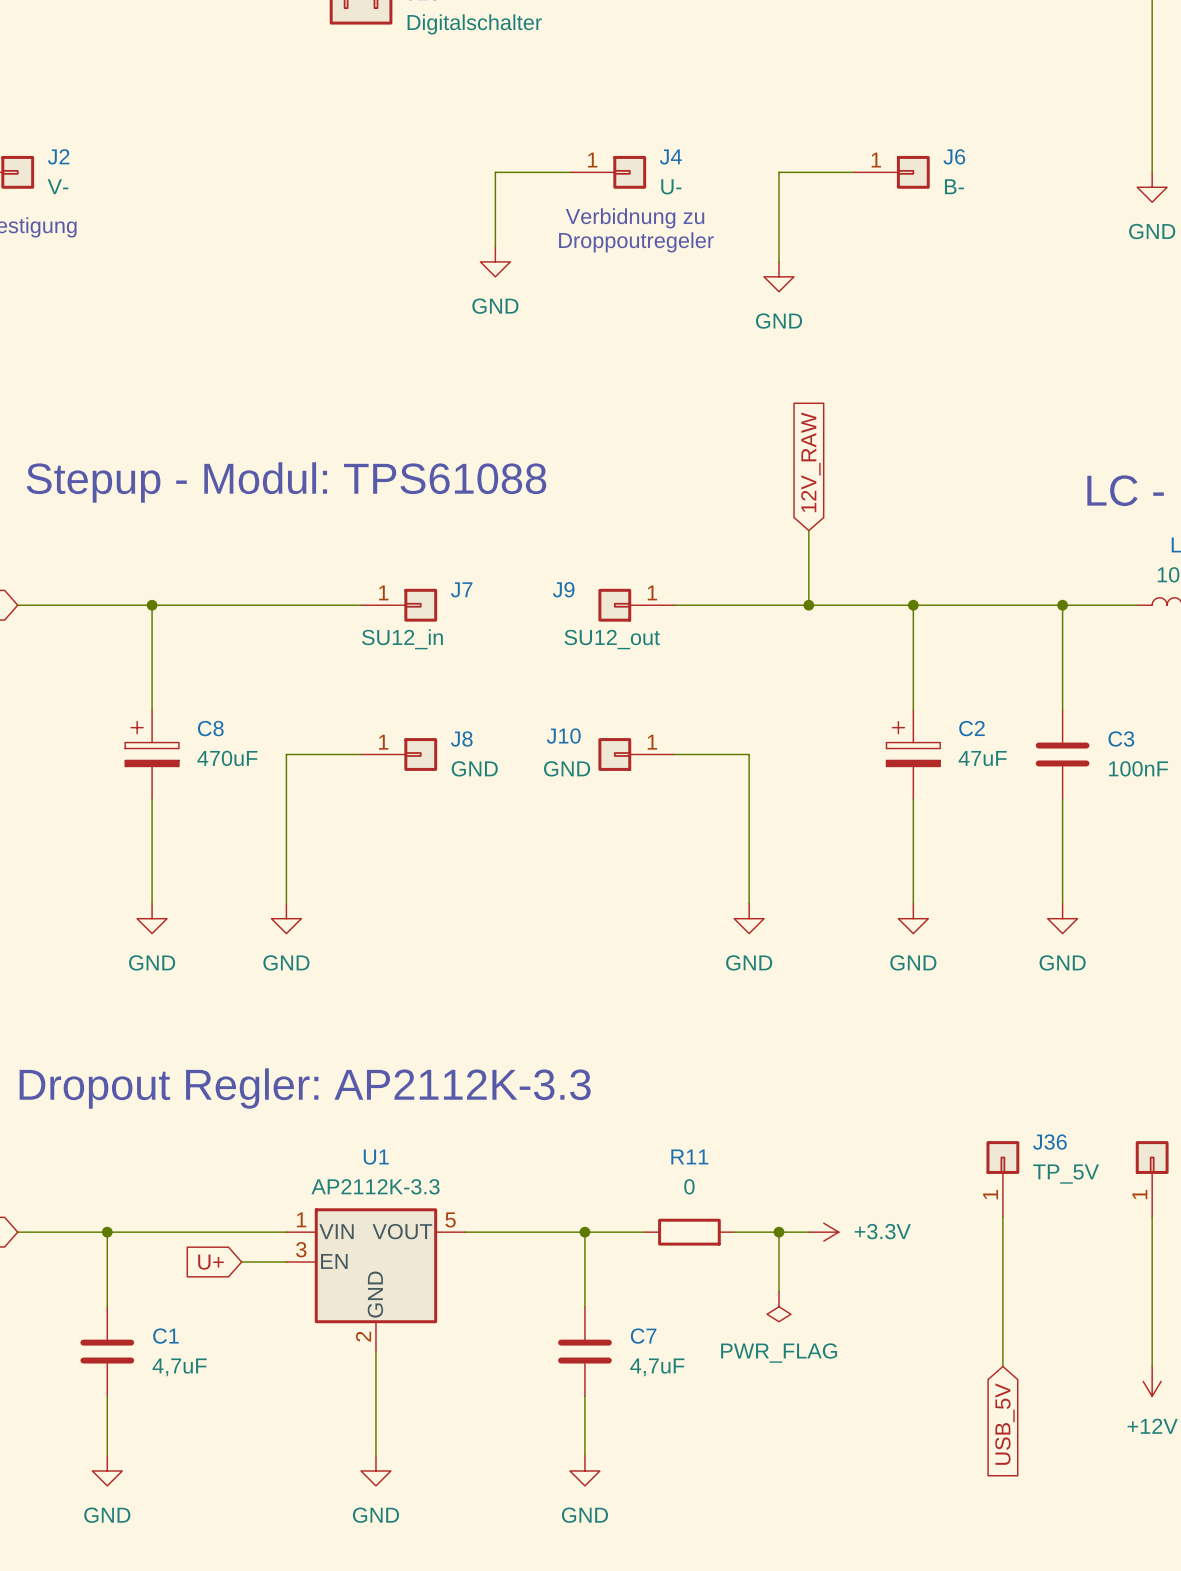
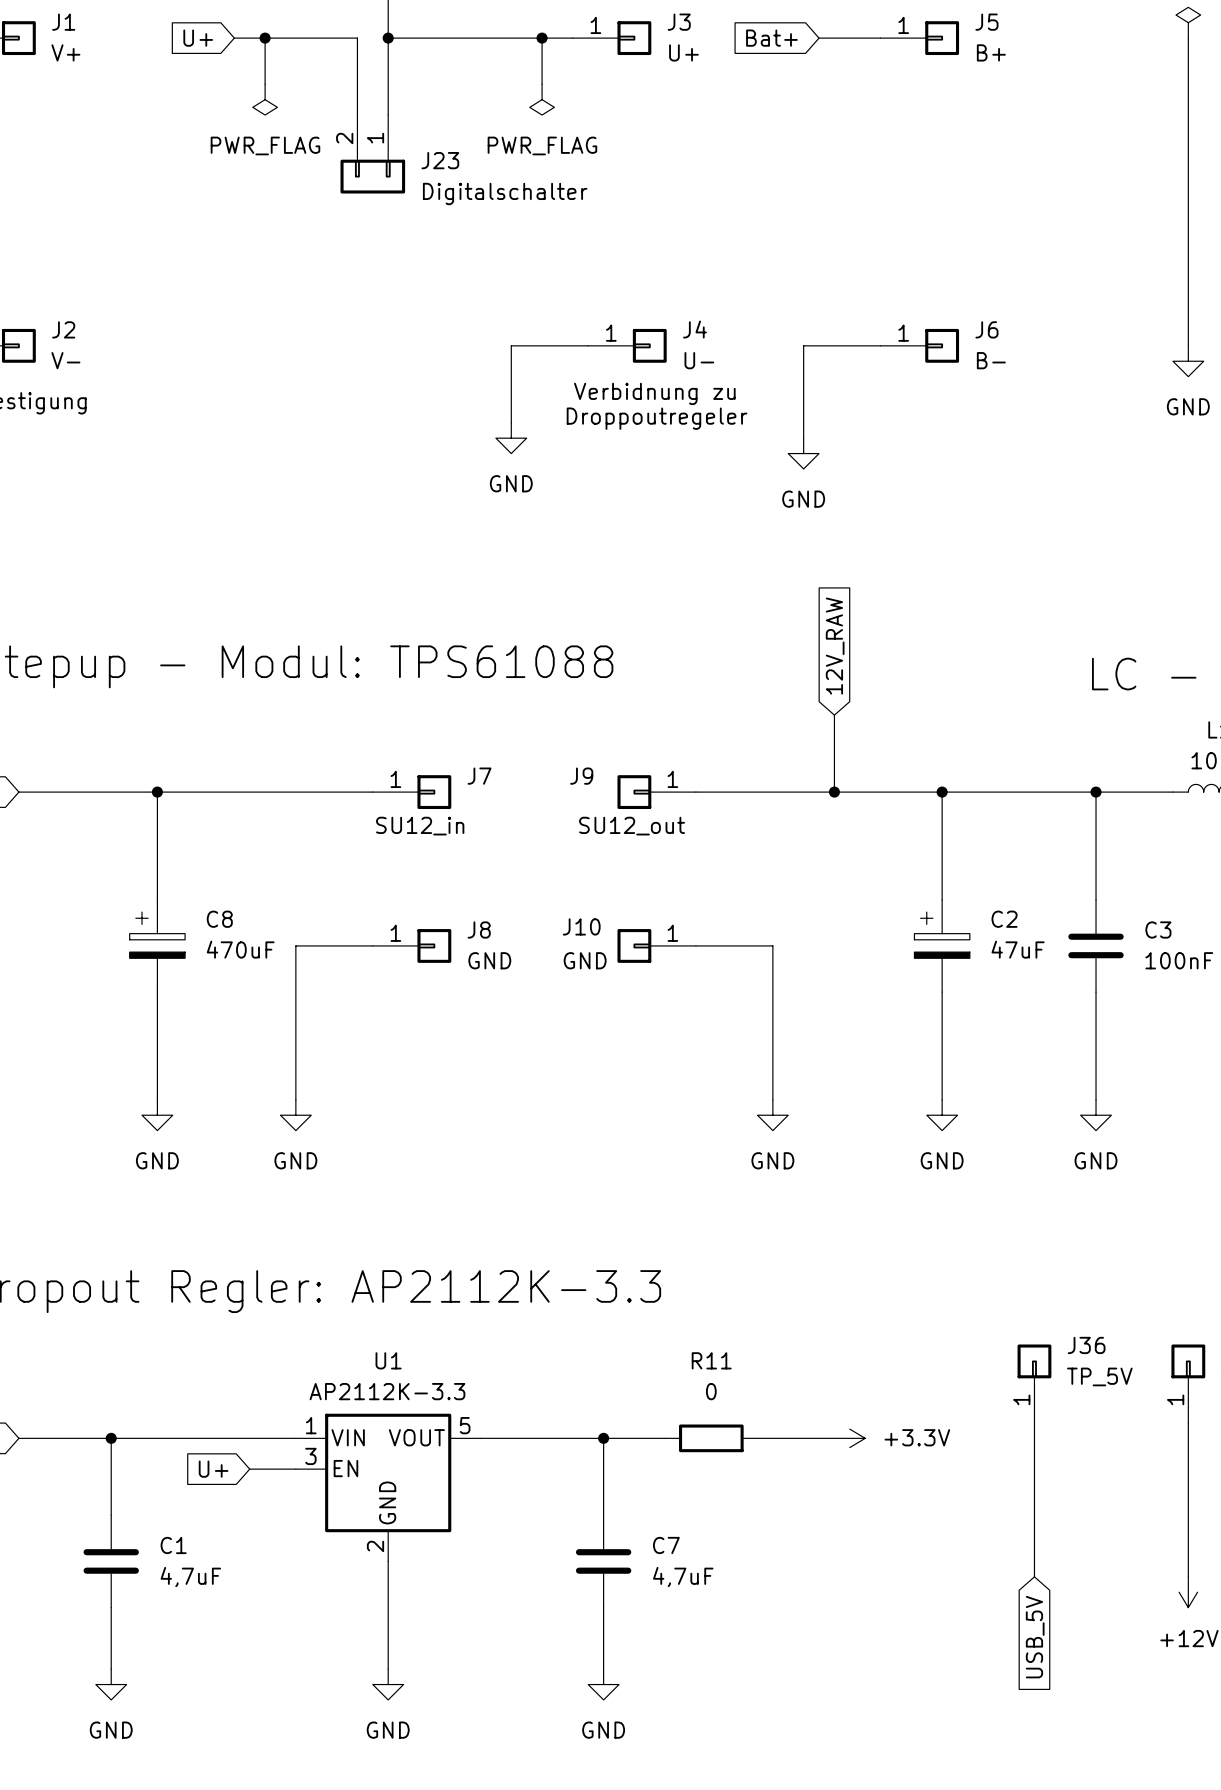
wire: (778, 1232) (778, 1291) -> none
junction: (778, 1232) -> none
power symbol: PWR_FLAG (778, 1306) -> none

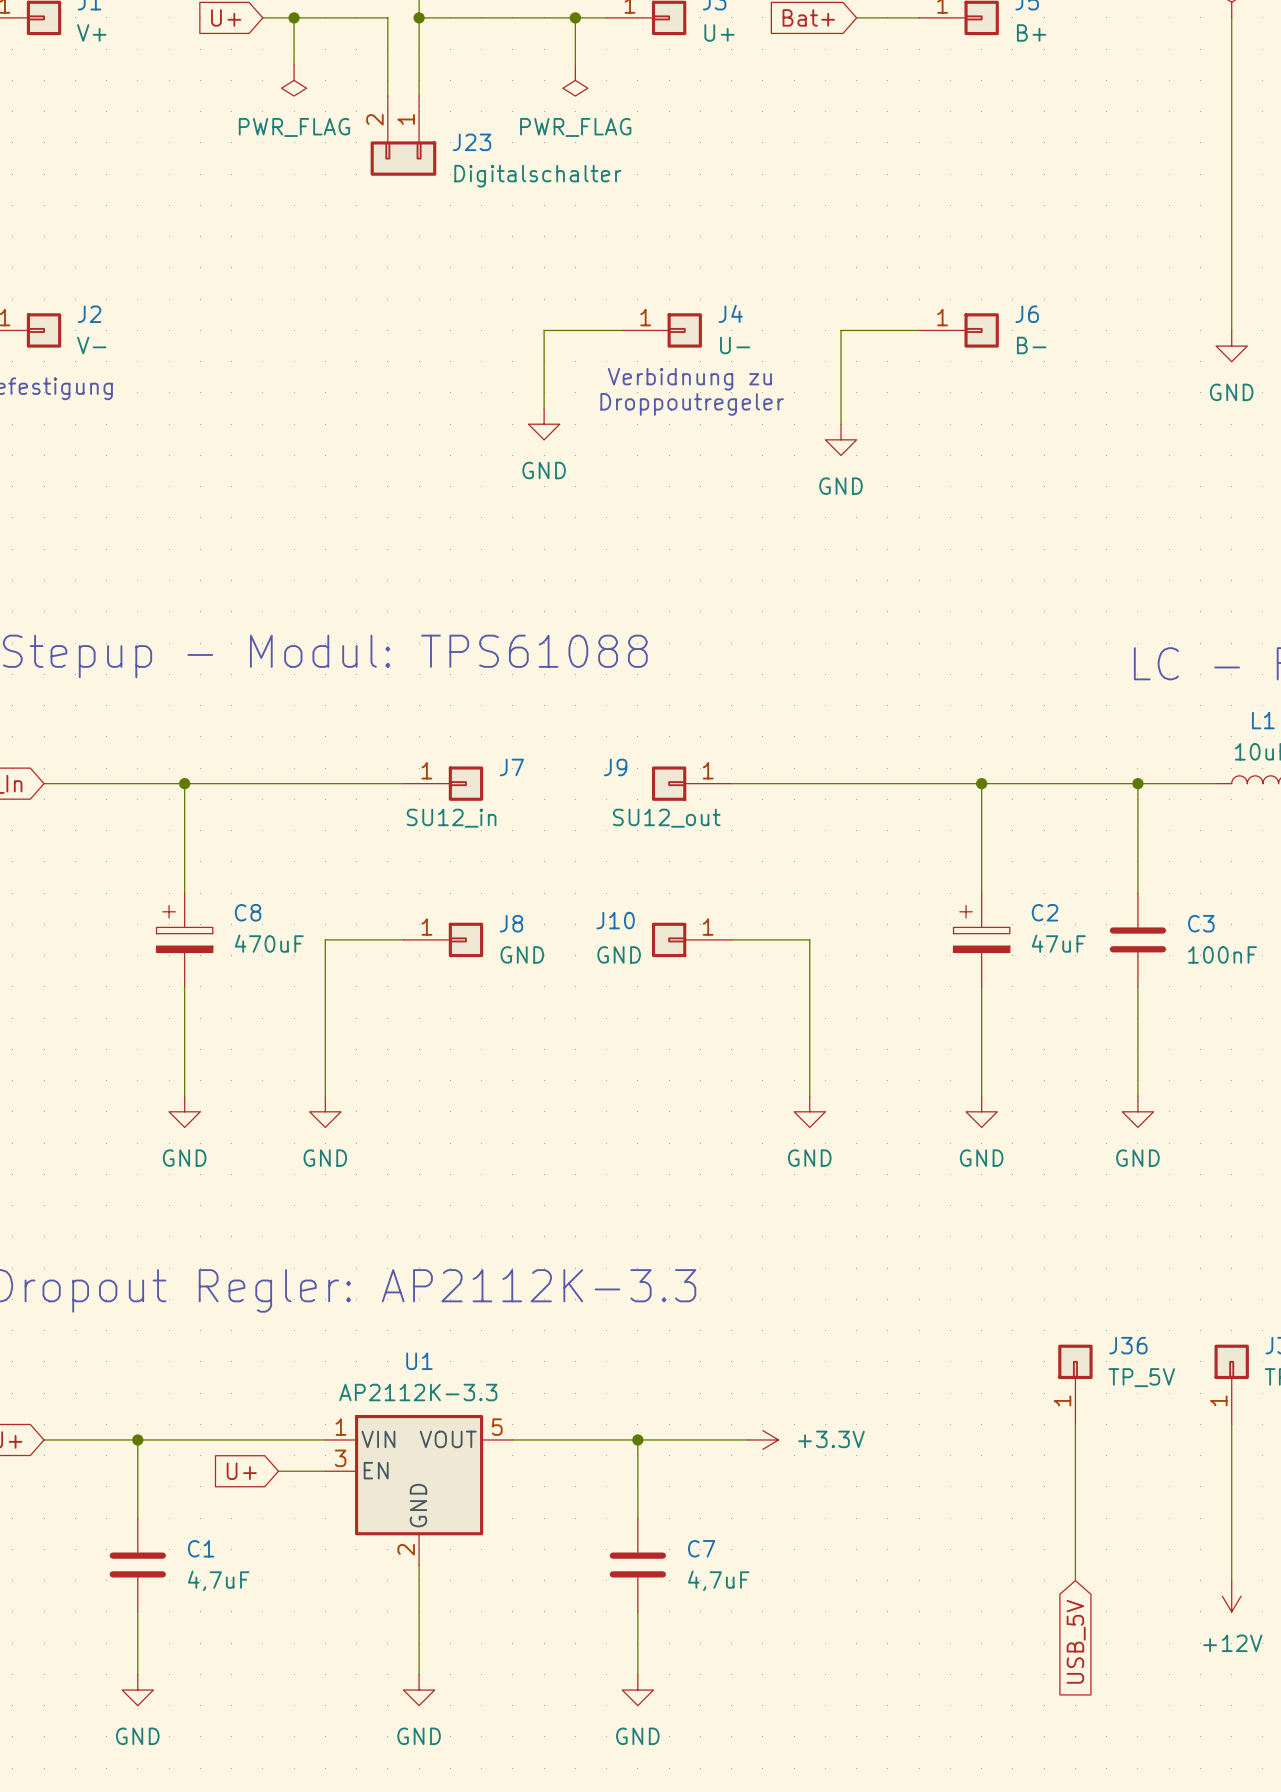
global label: 12V_RAW (835, 646) -> none
wire: (834, 715) (834, 792) -> none
junction: (834, 792) -> none
wire: none -> (700, 1439) (747, 1439)
R11: 0 (711, 1438) -> none
wire: (757, 1438) (834, 1438) -> none
power symbol position: +3.3V (849, 1438) -> +3.3V (762, 1439)

